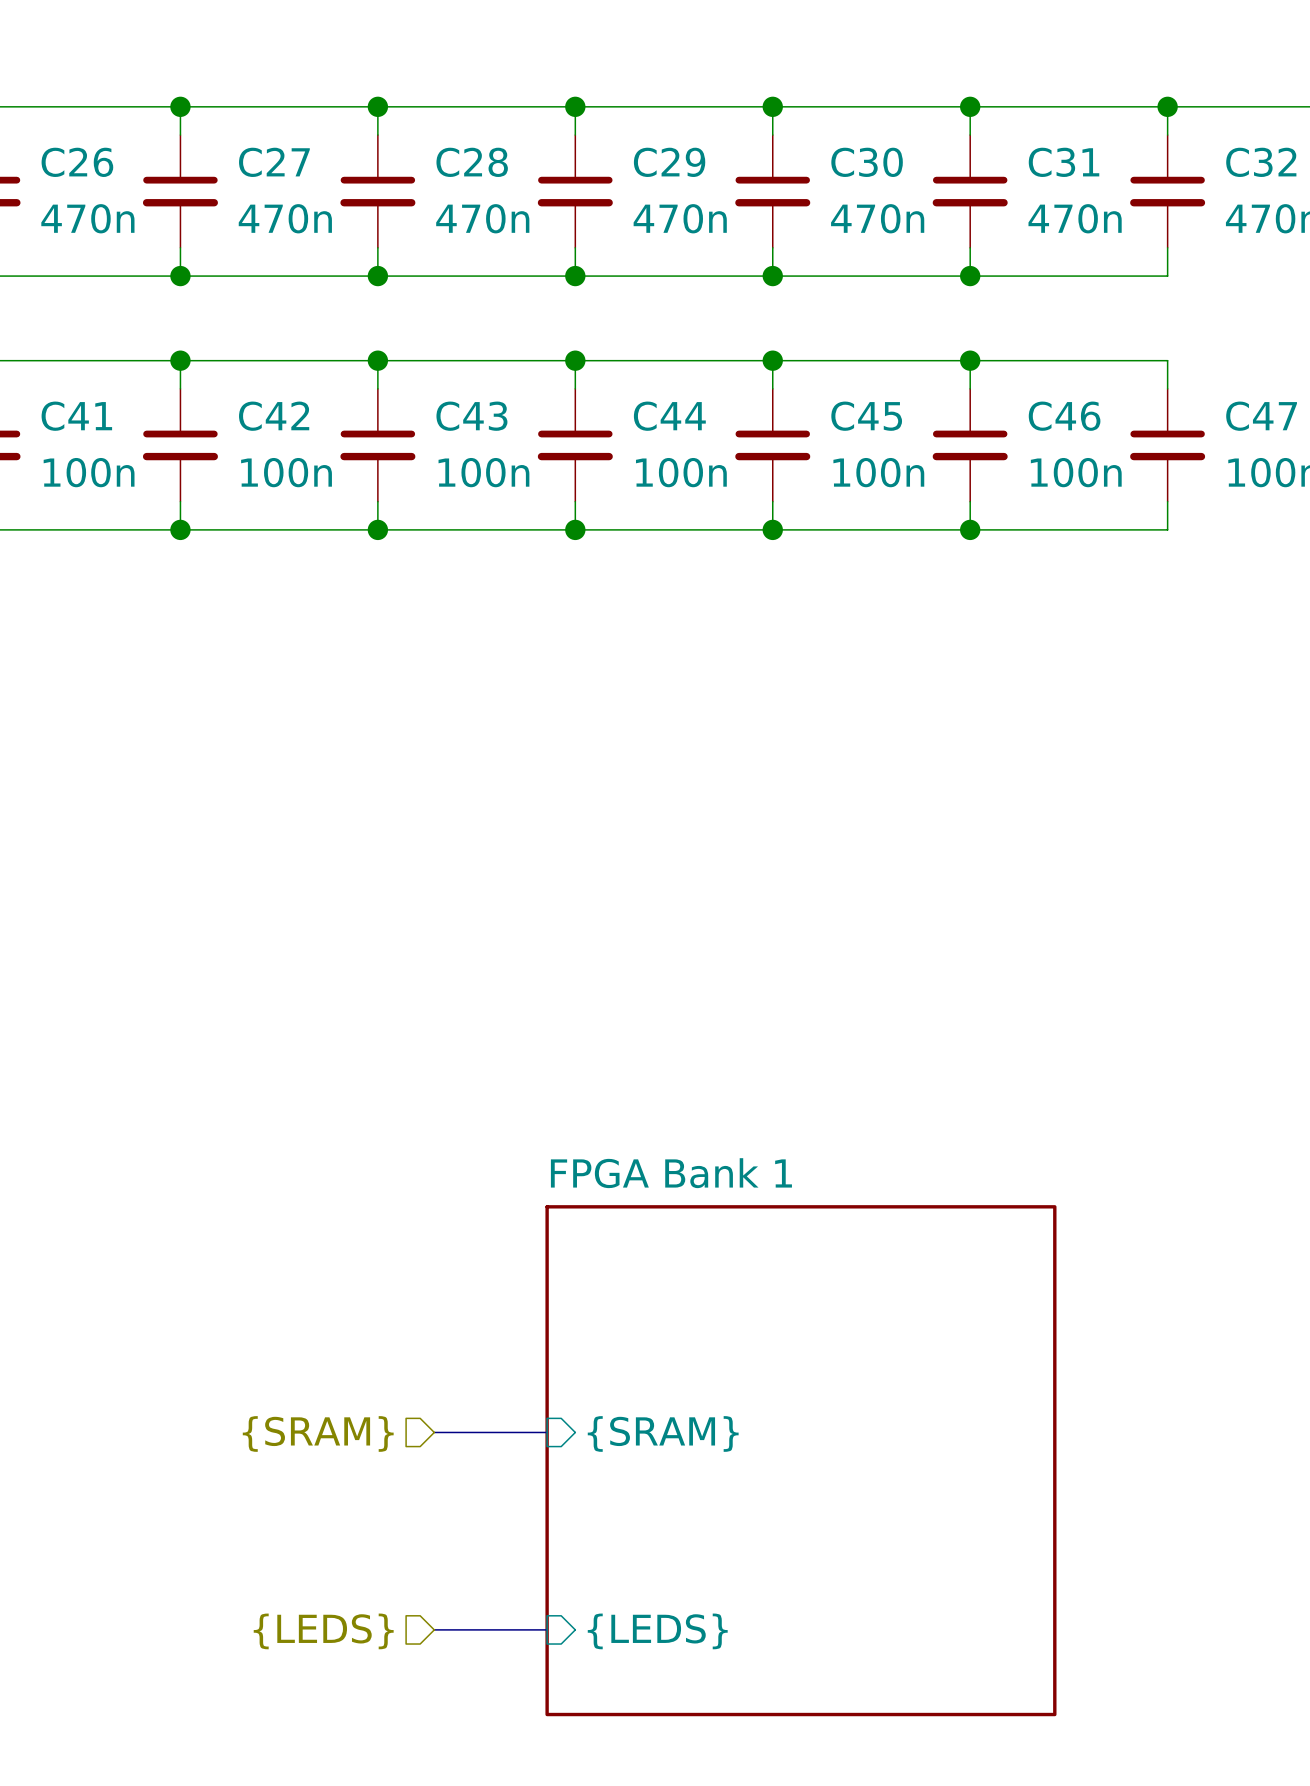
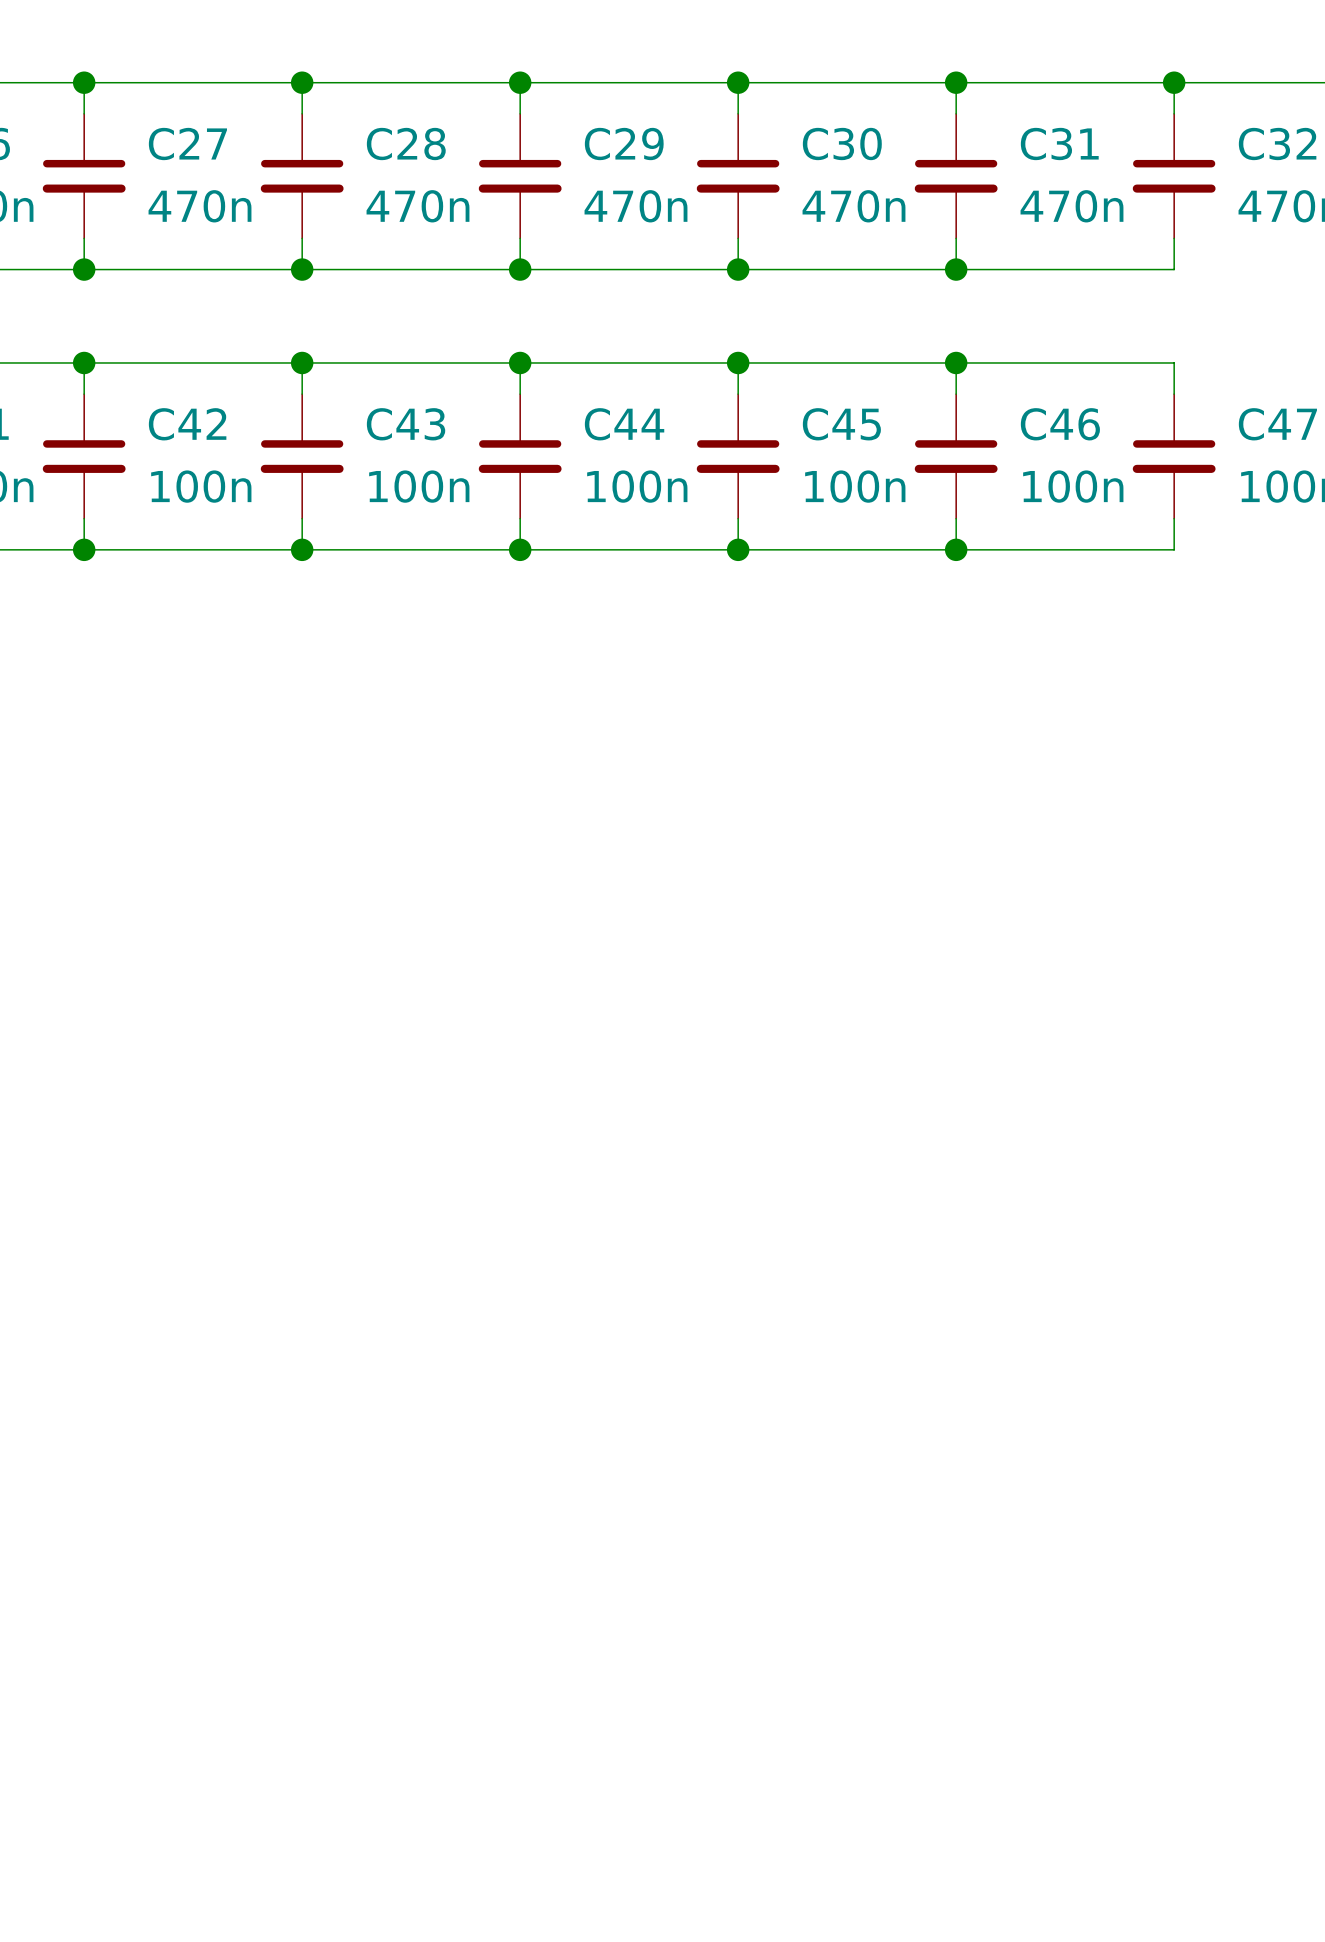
bus: (434, 1432) (547, 1432) -> none
hierarchical label: {SRAM} (318, 1433) -> none
sheet pin: {SRAM} (663, 1433) -> none
sheet FPGA Bank 1: (800, 1460) -> none
bus: (434, 1629) (547, 1629) -> none
hierarchical label: {LEDS} (323, 1631) -> none
sheet pin: {LEDS} (657, 1631) -> none

